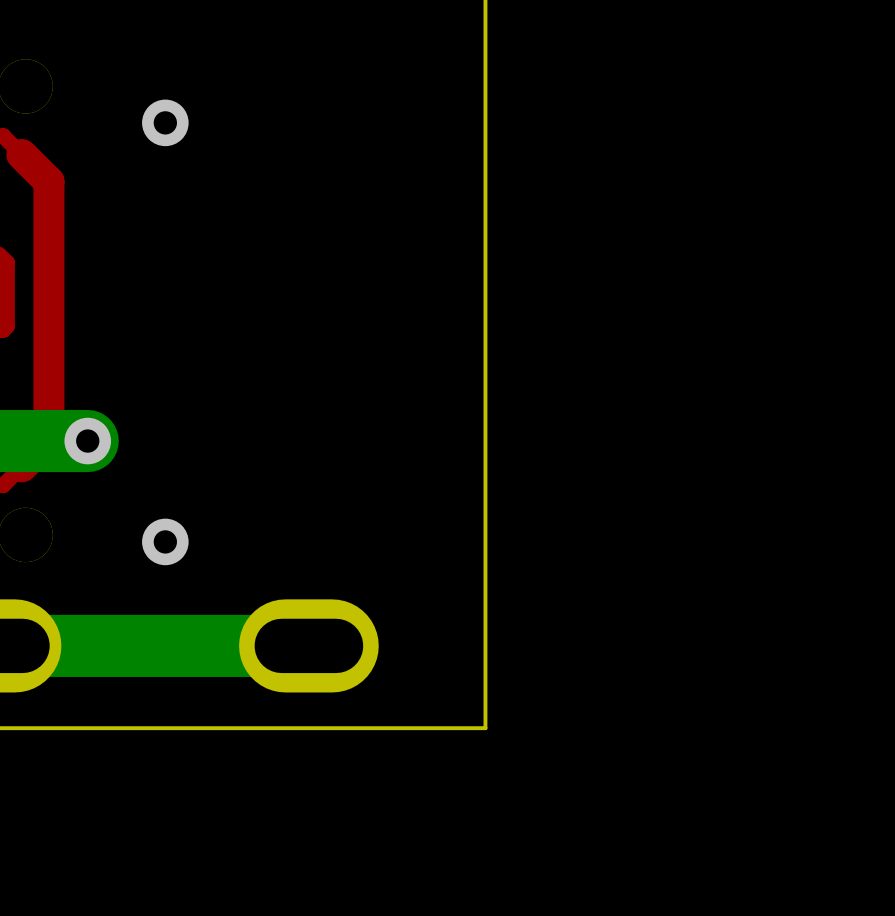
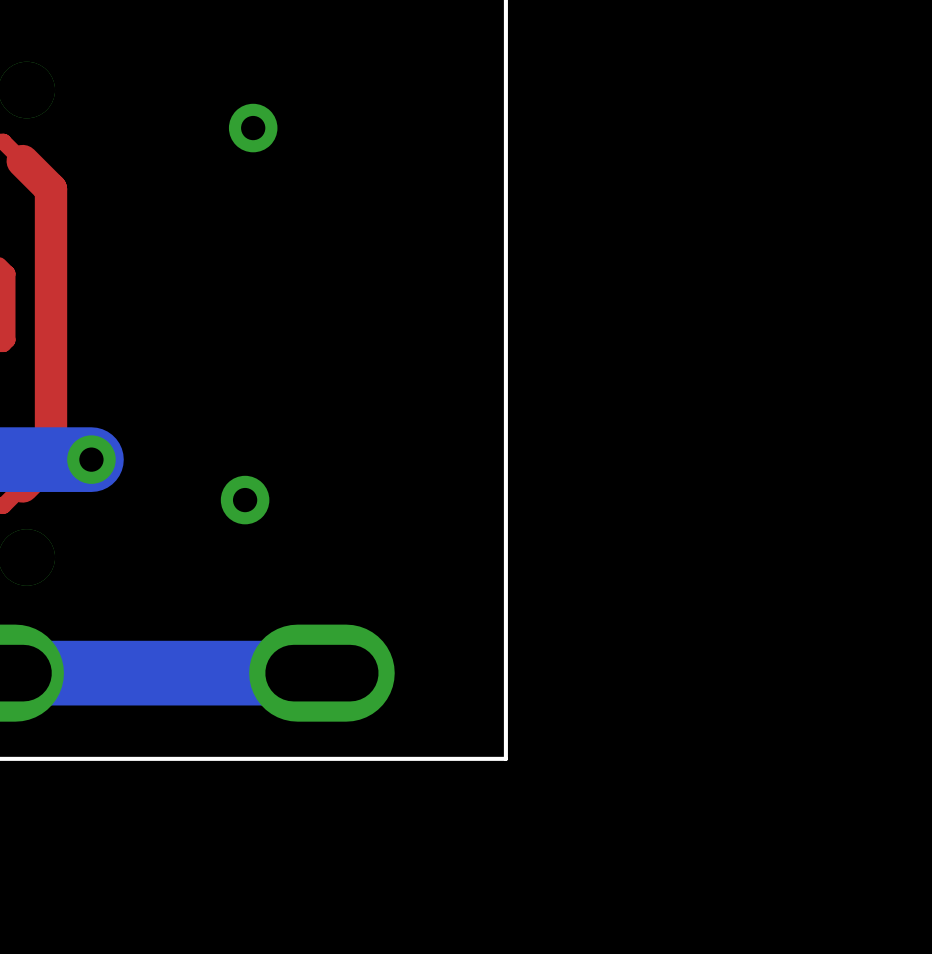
via position: (165, 122) -> (253, 128)
via position: (165, 541) -> (245, 500)

